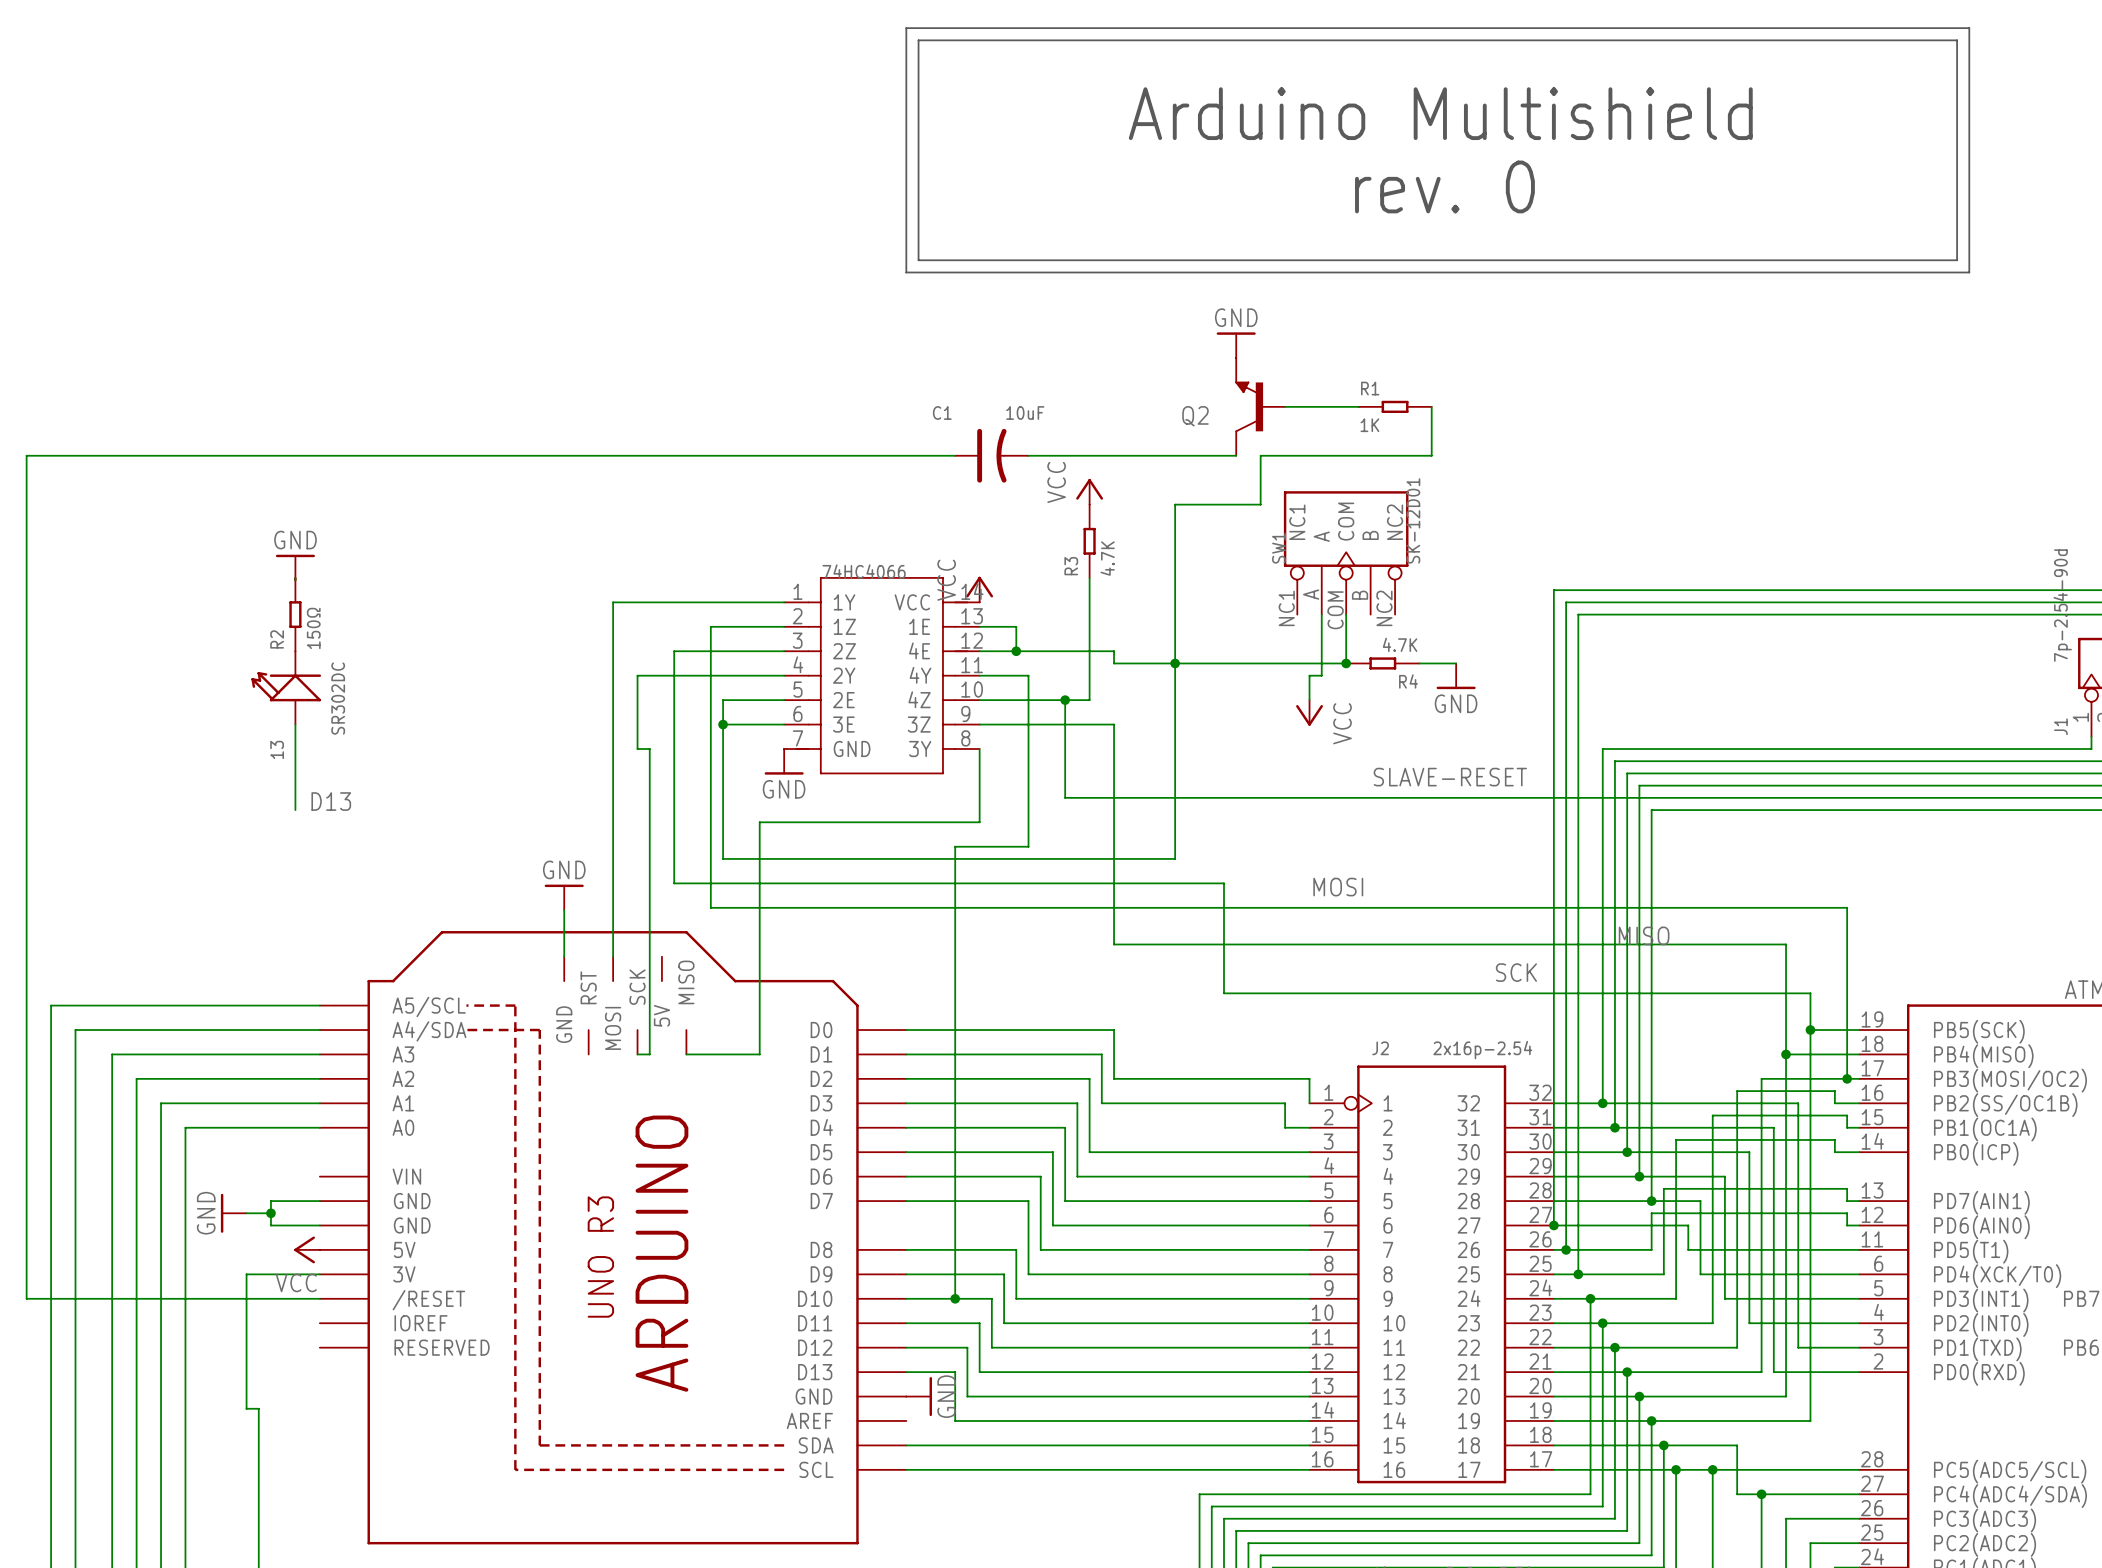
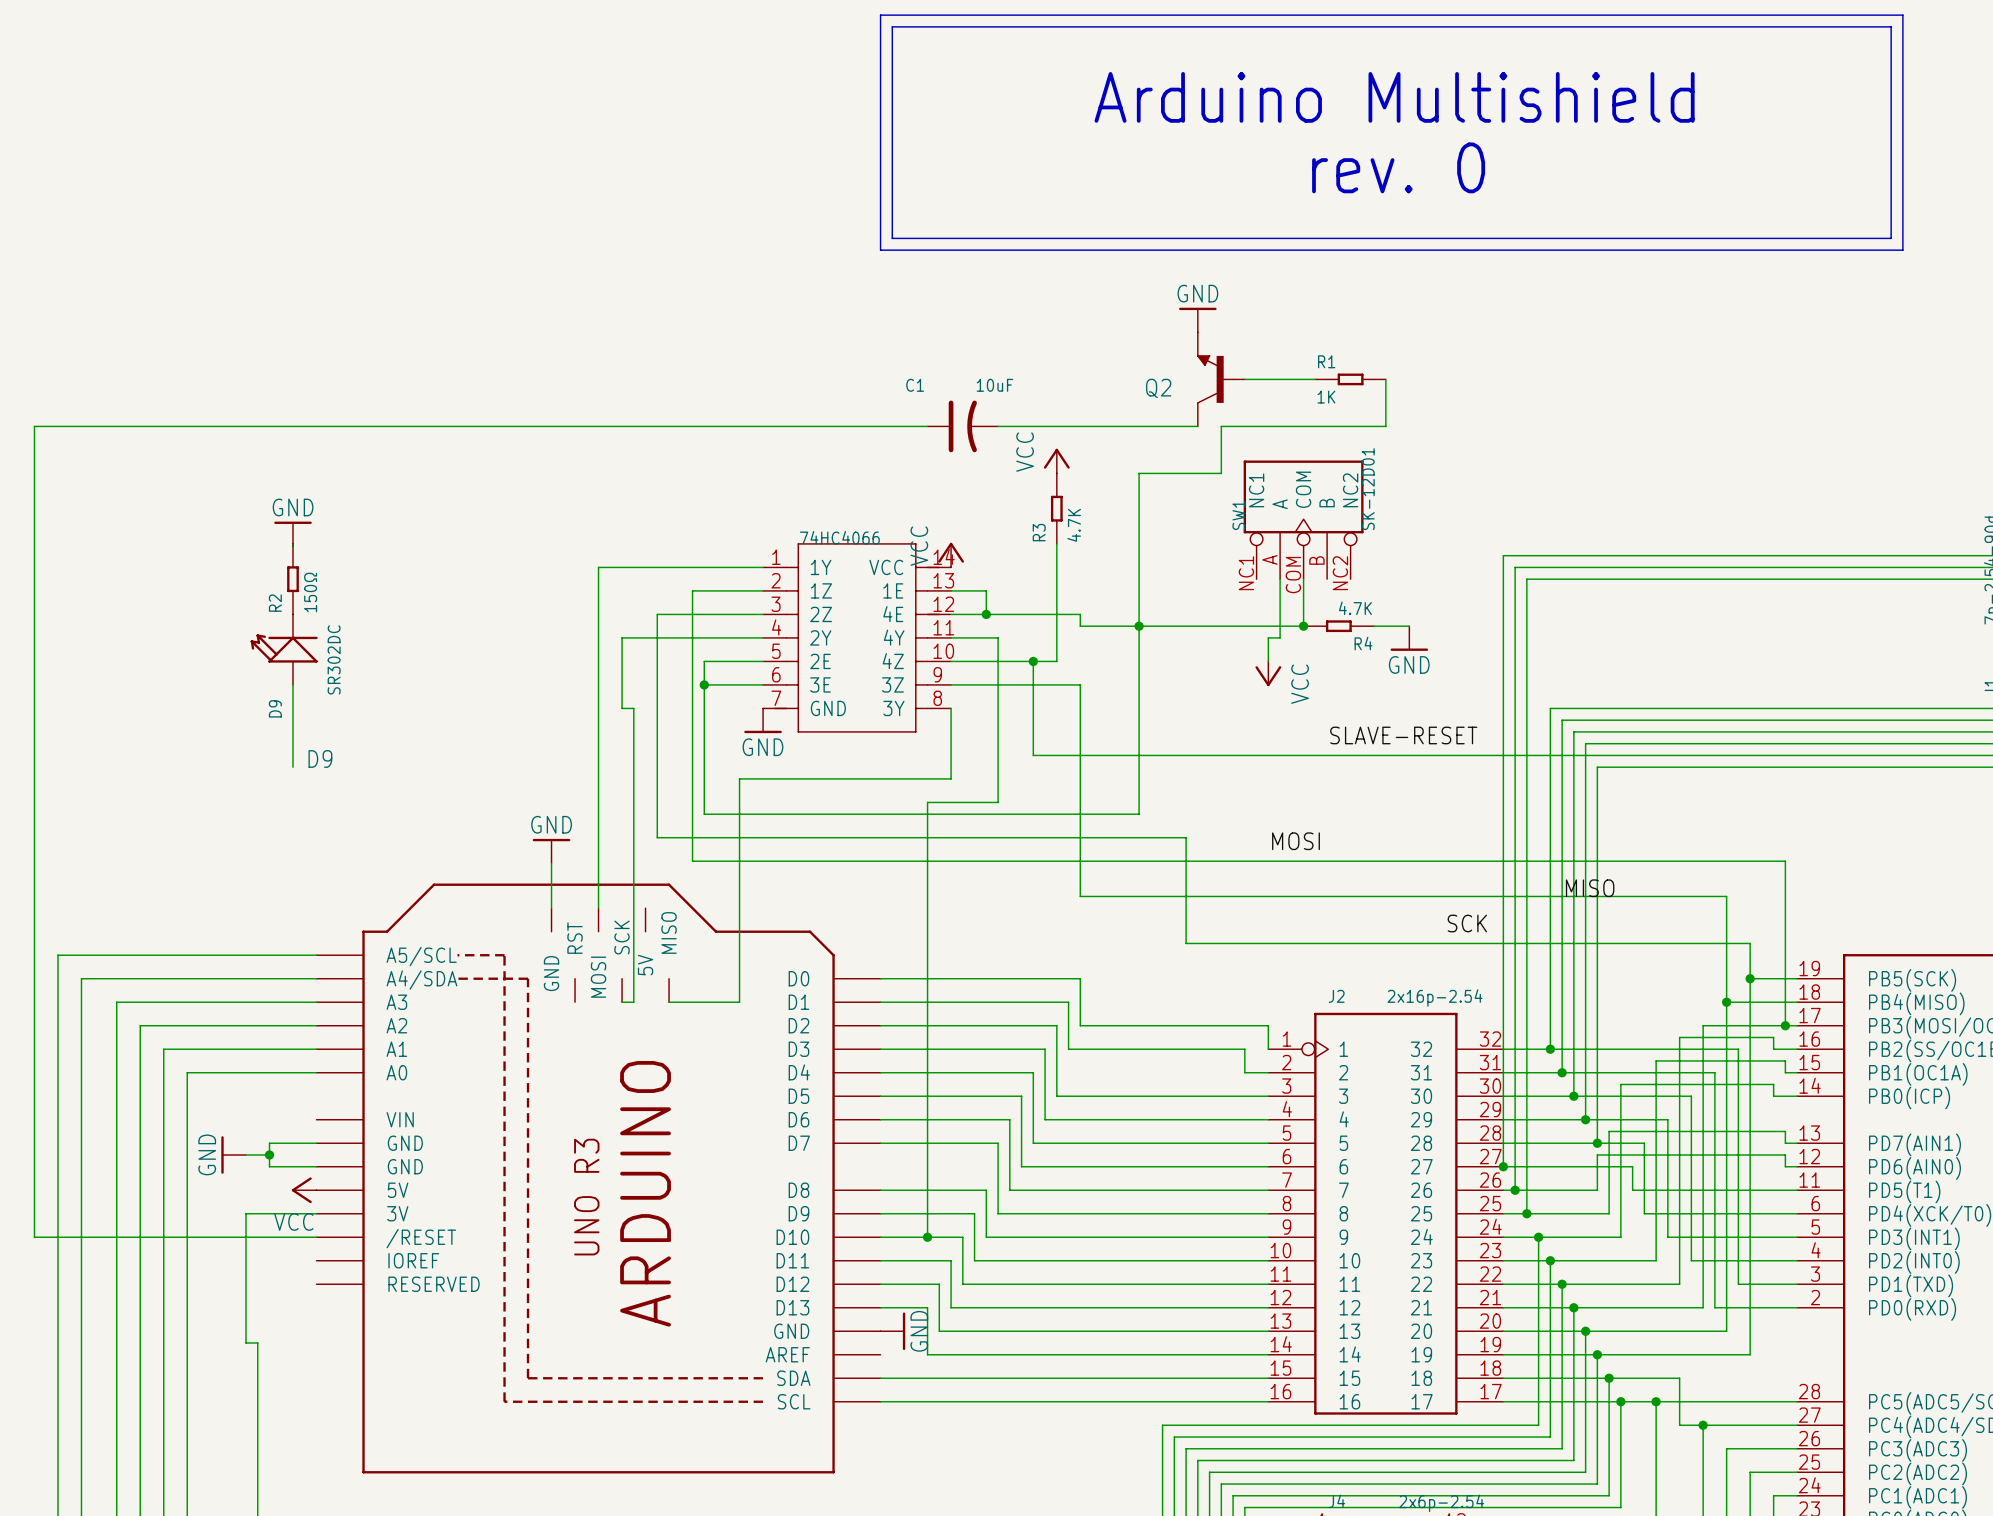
13 name: 13 (277, 749) -> D9 (275, 708)
text: D13 (331, 801) -> D9 (320, 758)

